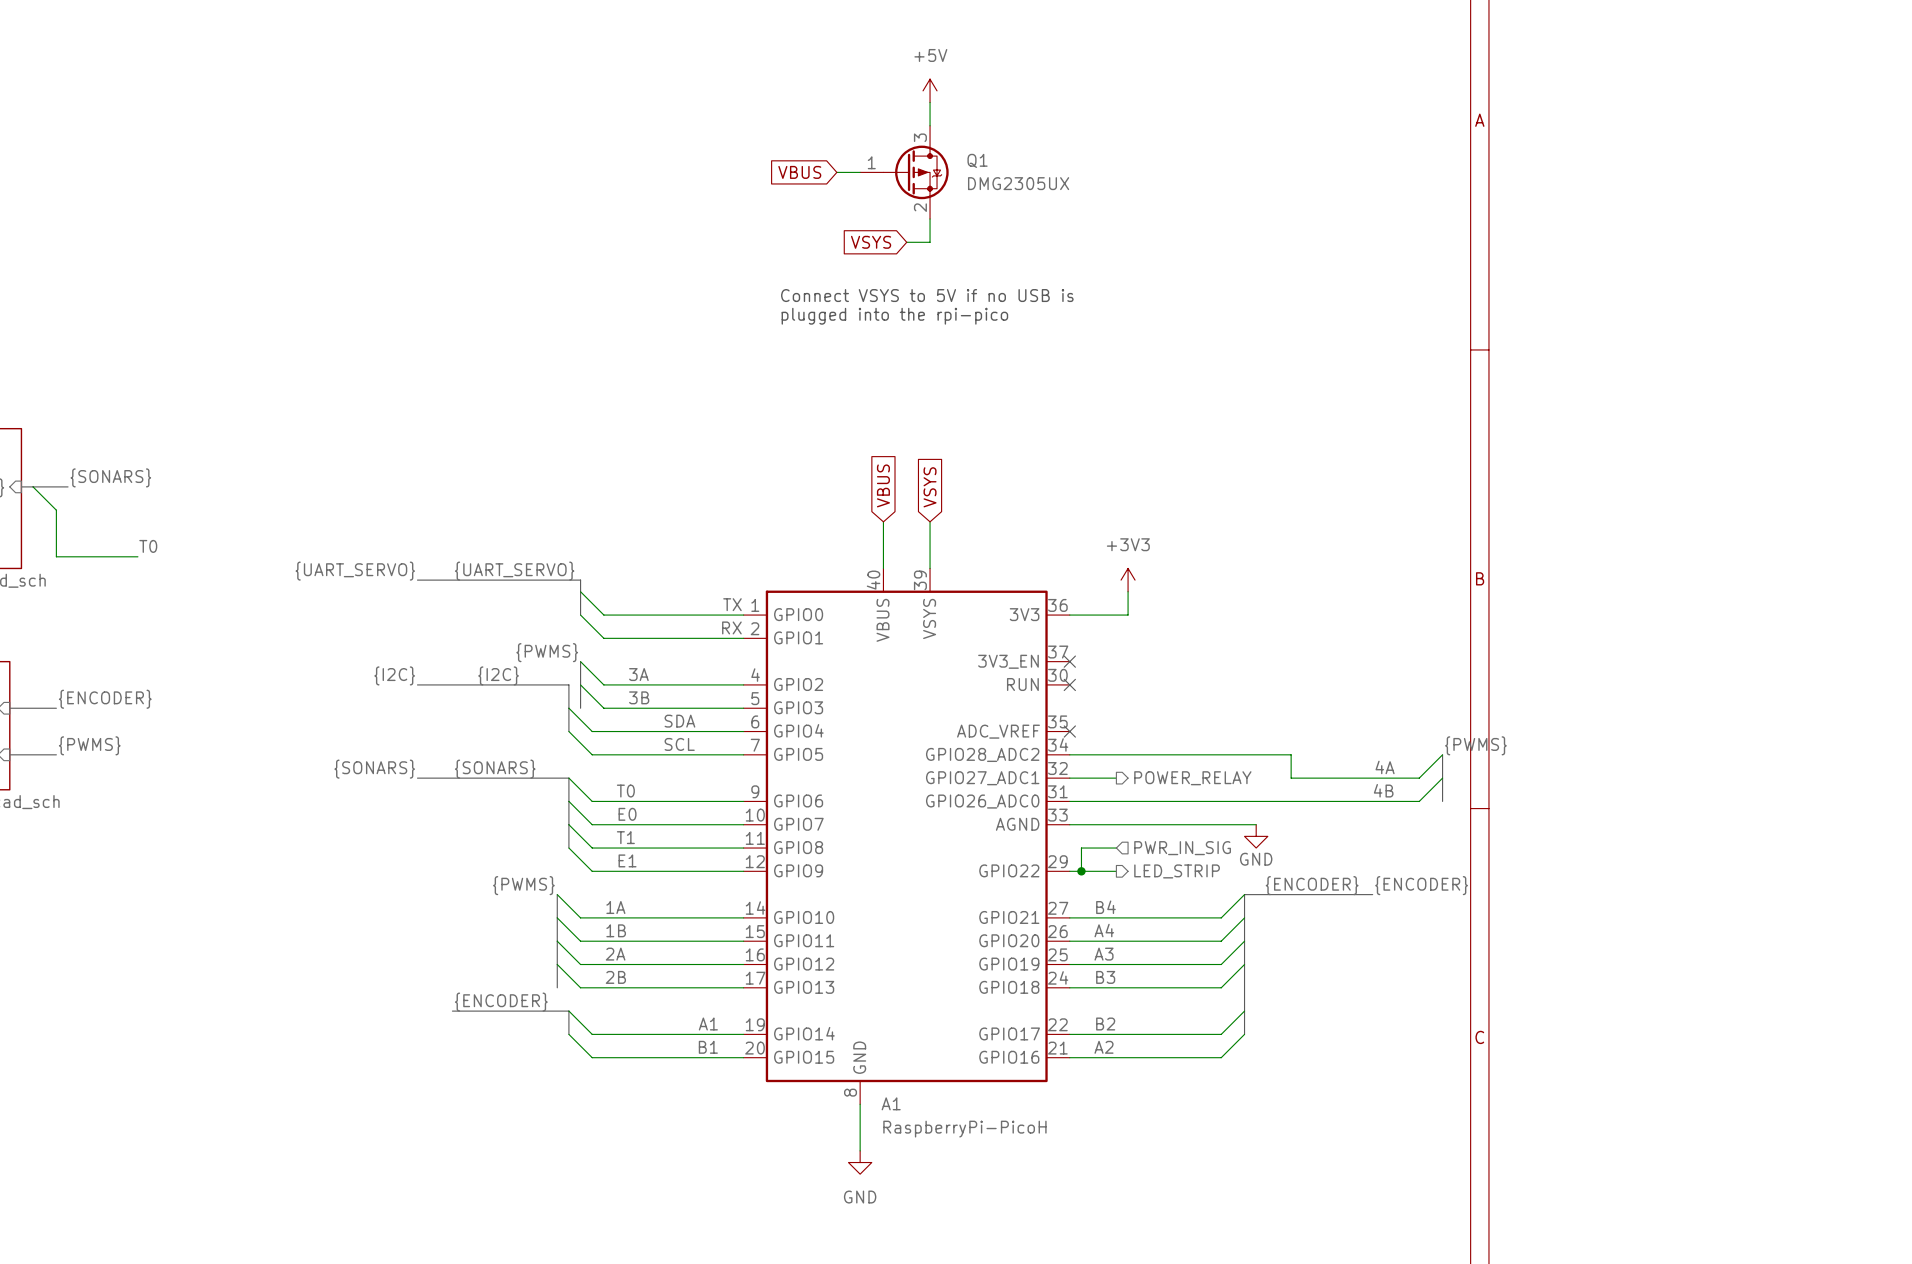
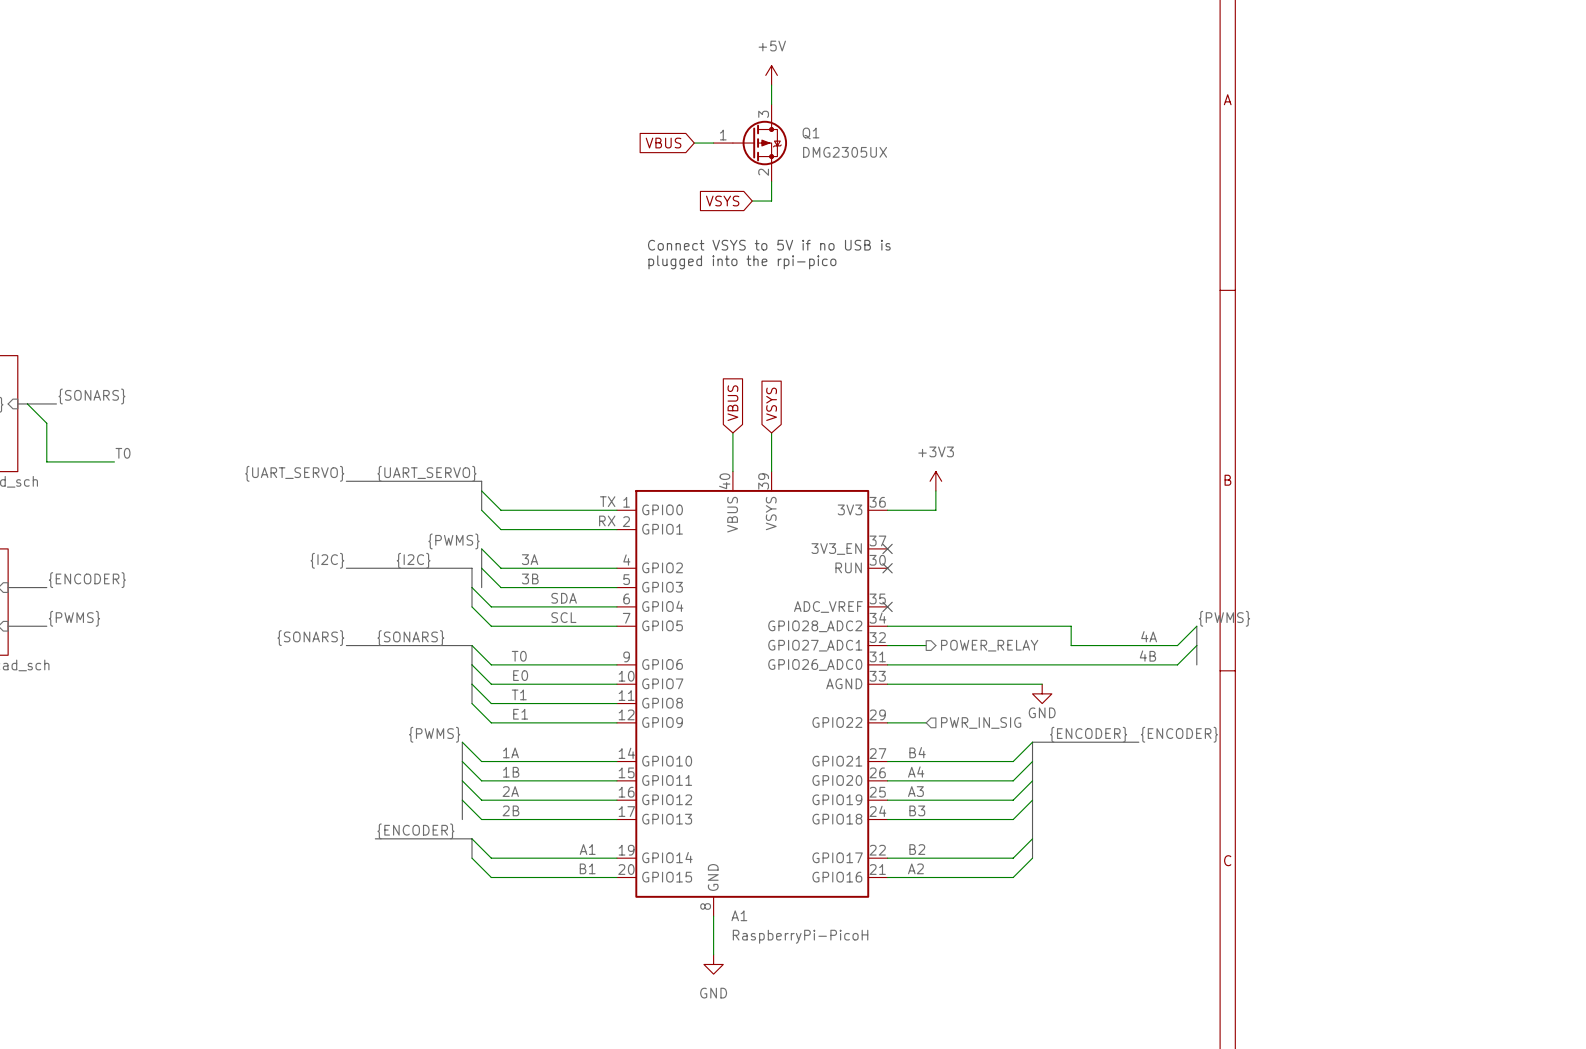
wire: (1116, 848) (1081, 848) (1081, 871) -> none
hierarchical label: PWR_IN_SIG (1182, 848) -> none
junction: (1081, 871) -> none
hierarchical label shape: output (1177, 871) -> input (981, 722)
hierarchical label: LED_STRIP (1177, 871) -> PWR_IN_SIG (981, 722)

